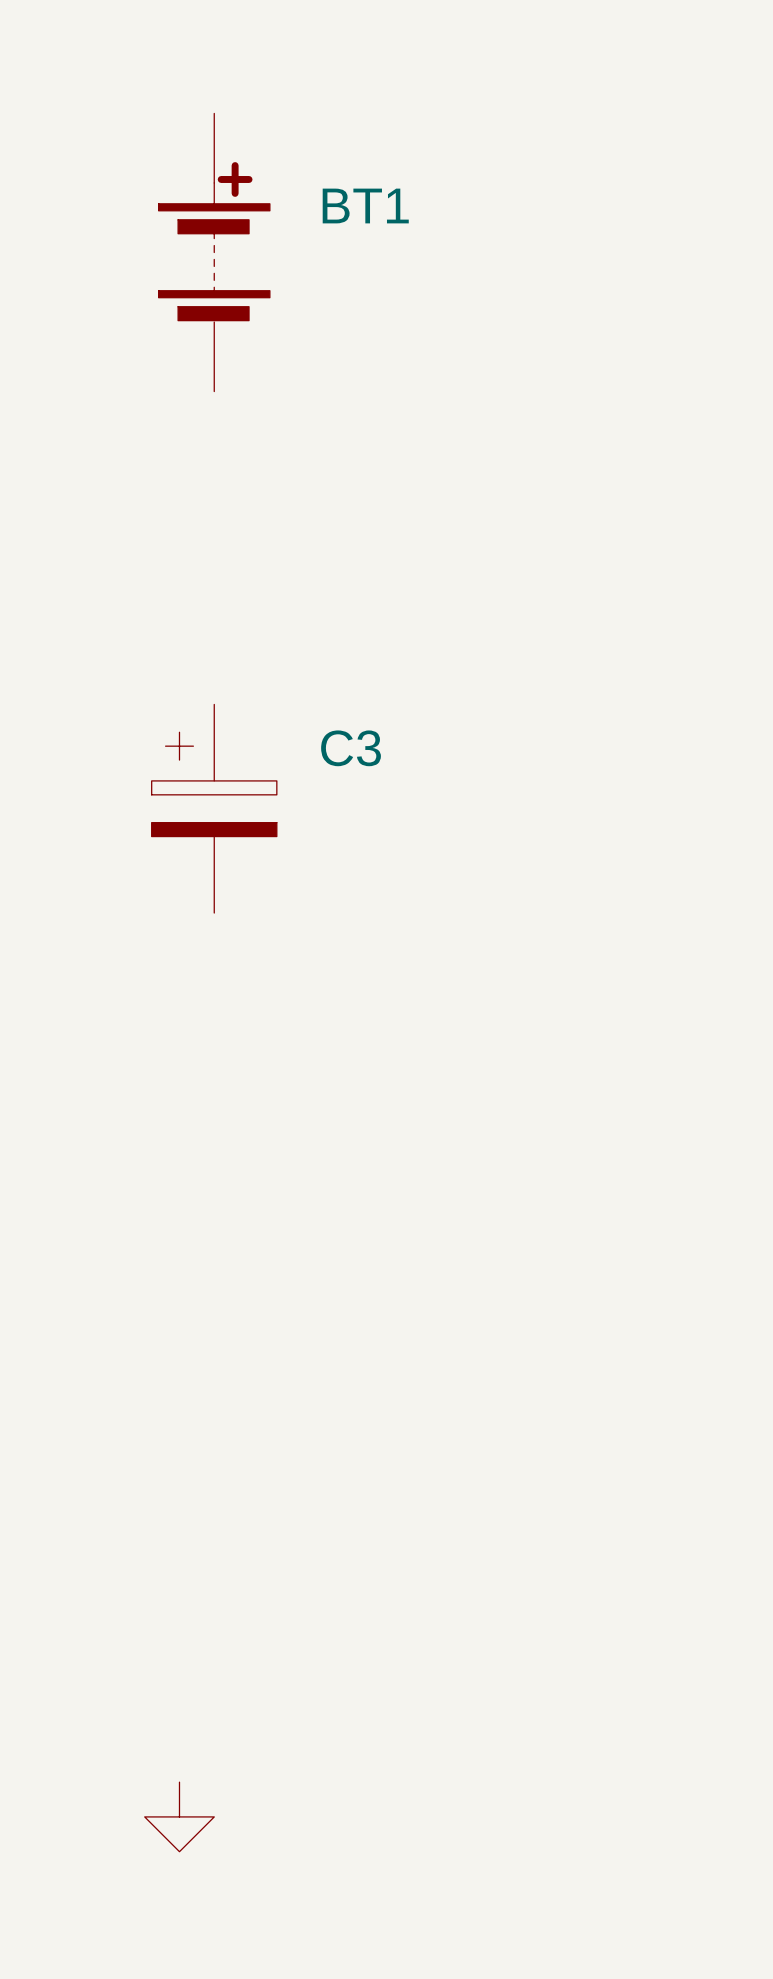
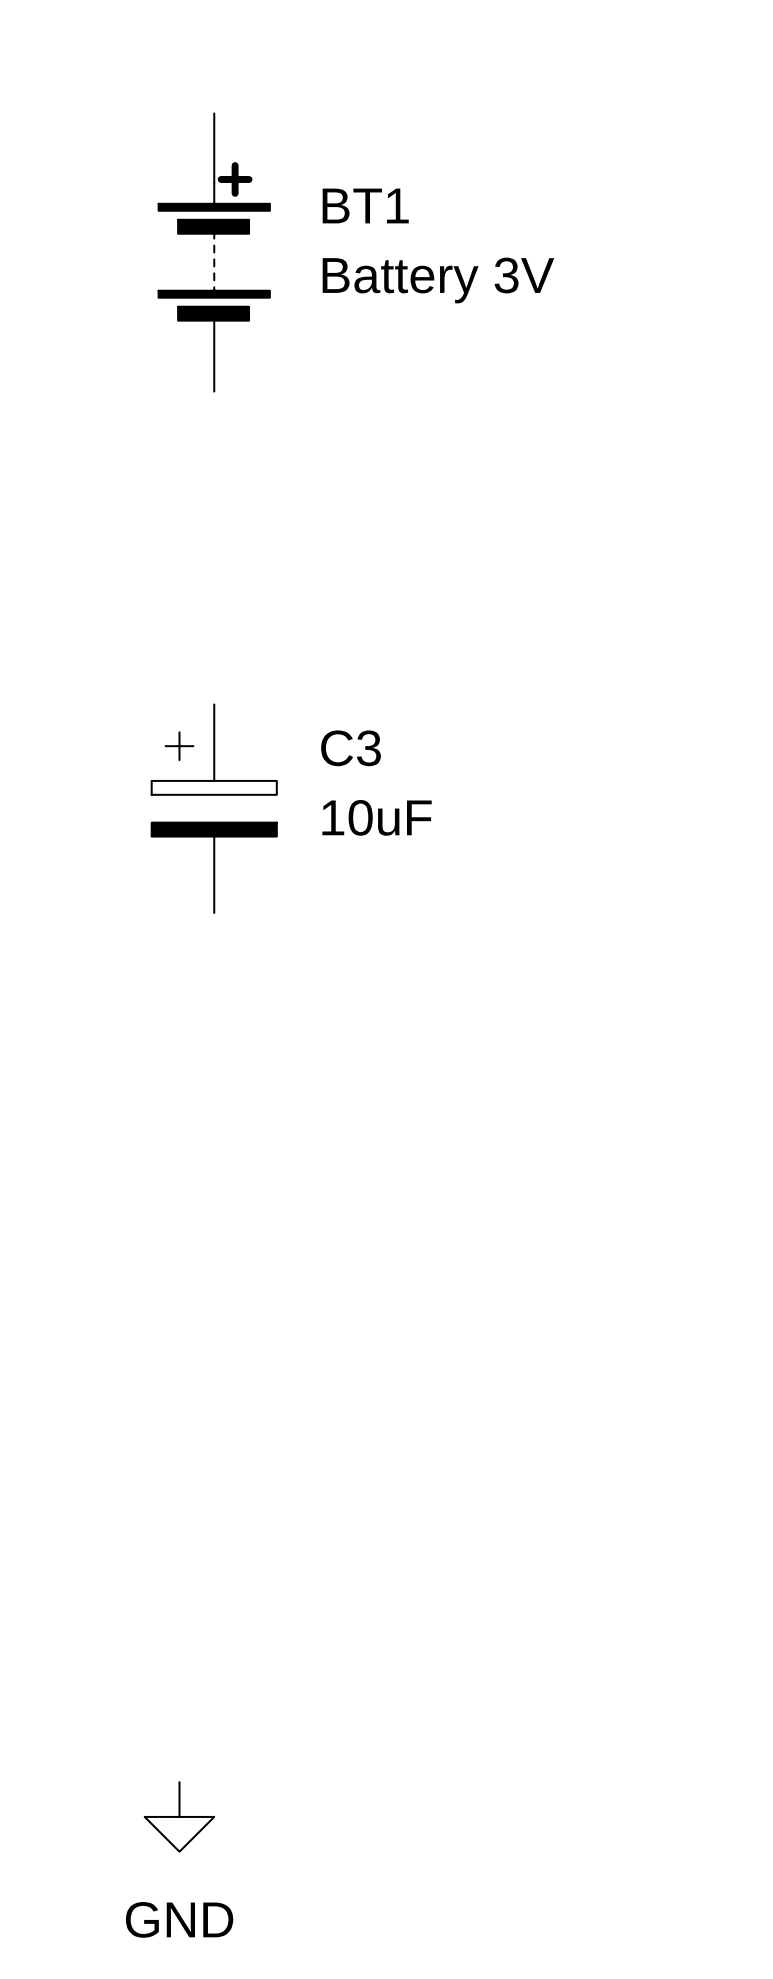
BT1 value: none -> Battery 3V (438, 280)
C3 value: none -> 10uF (377, 817)
power symbol text: none -> GND (179, 1919)

